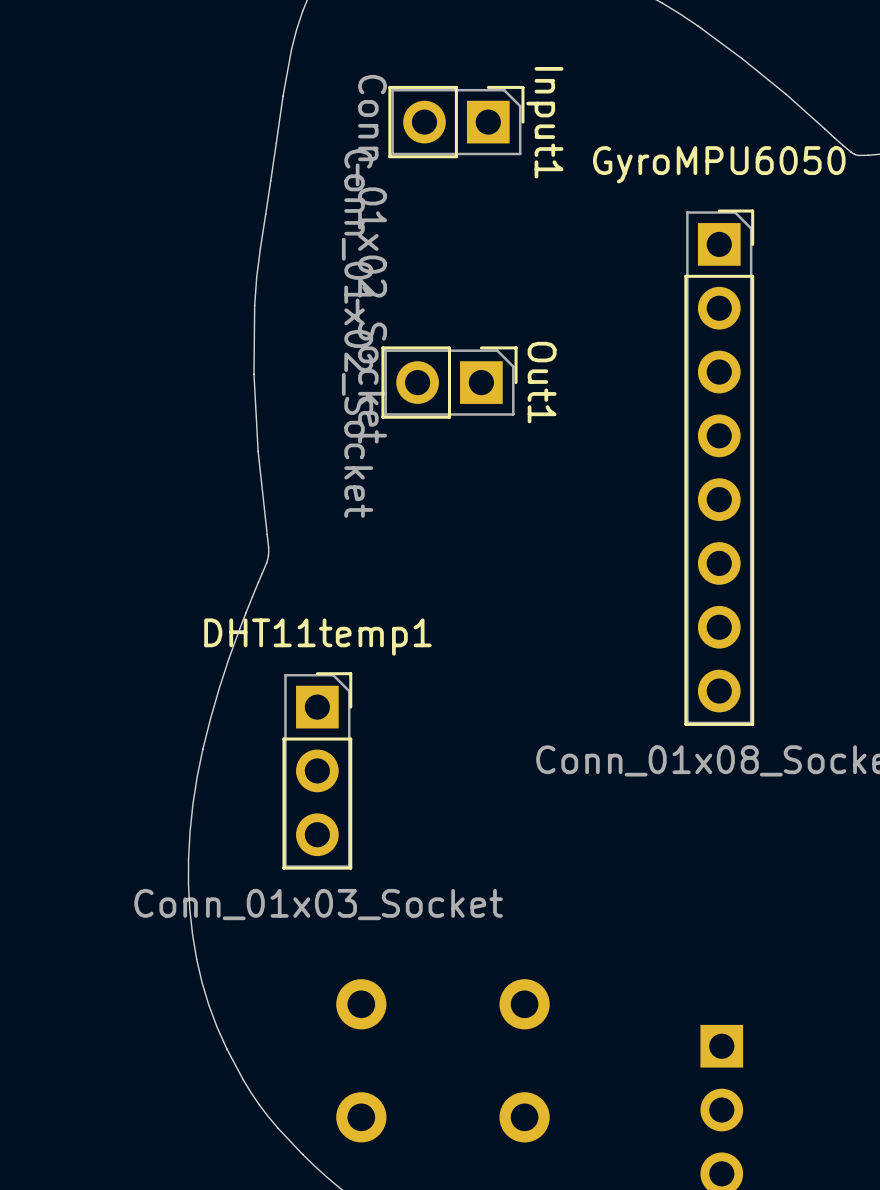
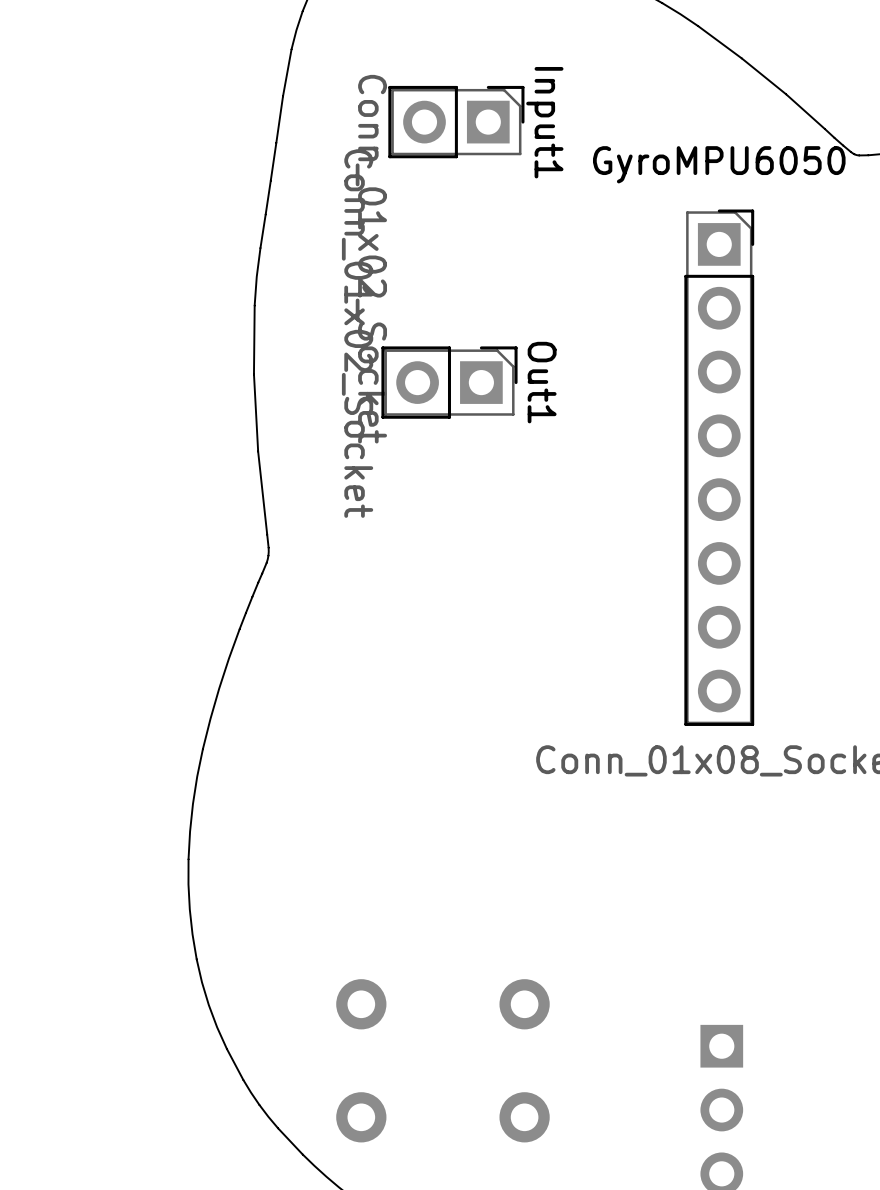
DHT11temp1: Conn_01x03_Socket (317, 770) -> none

